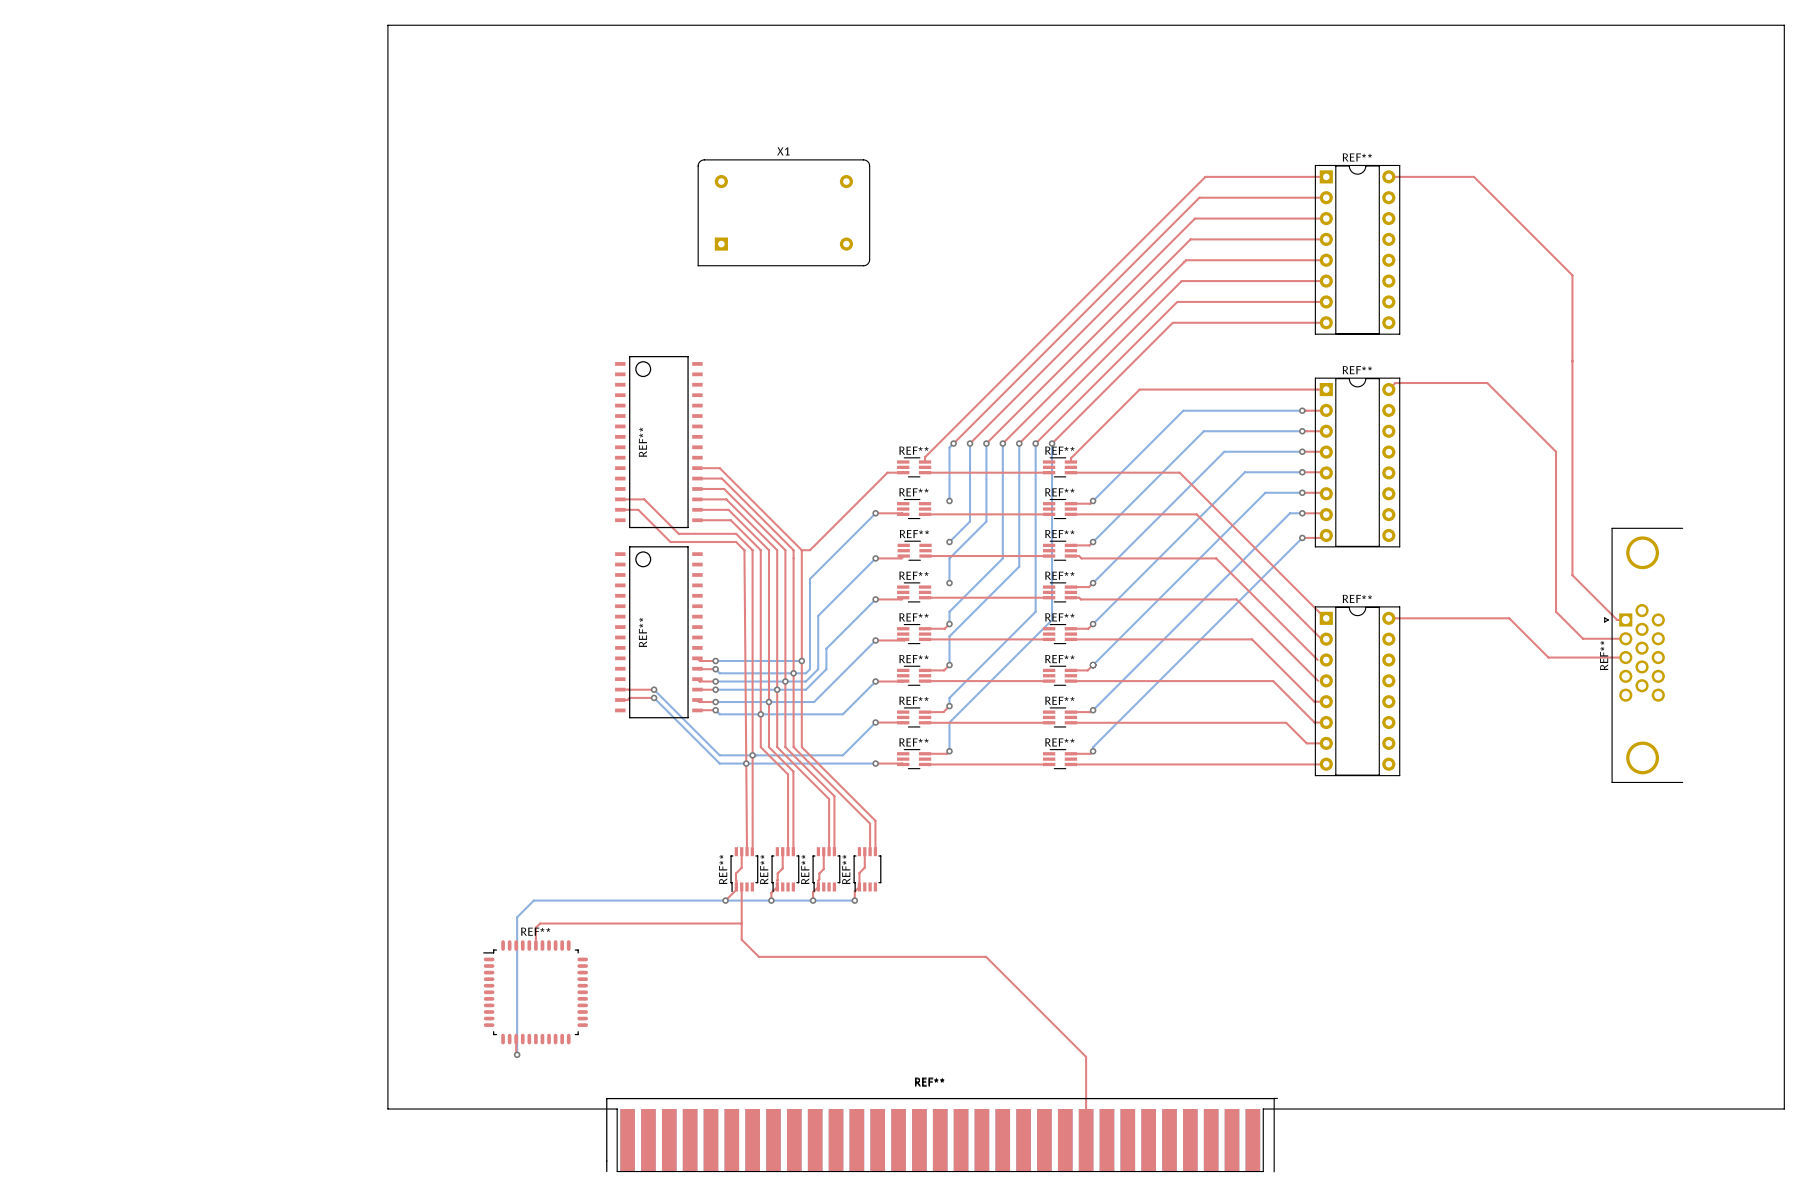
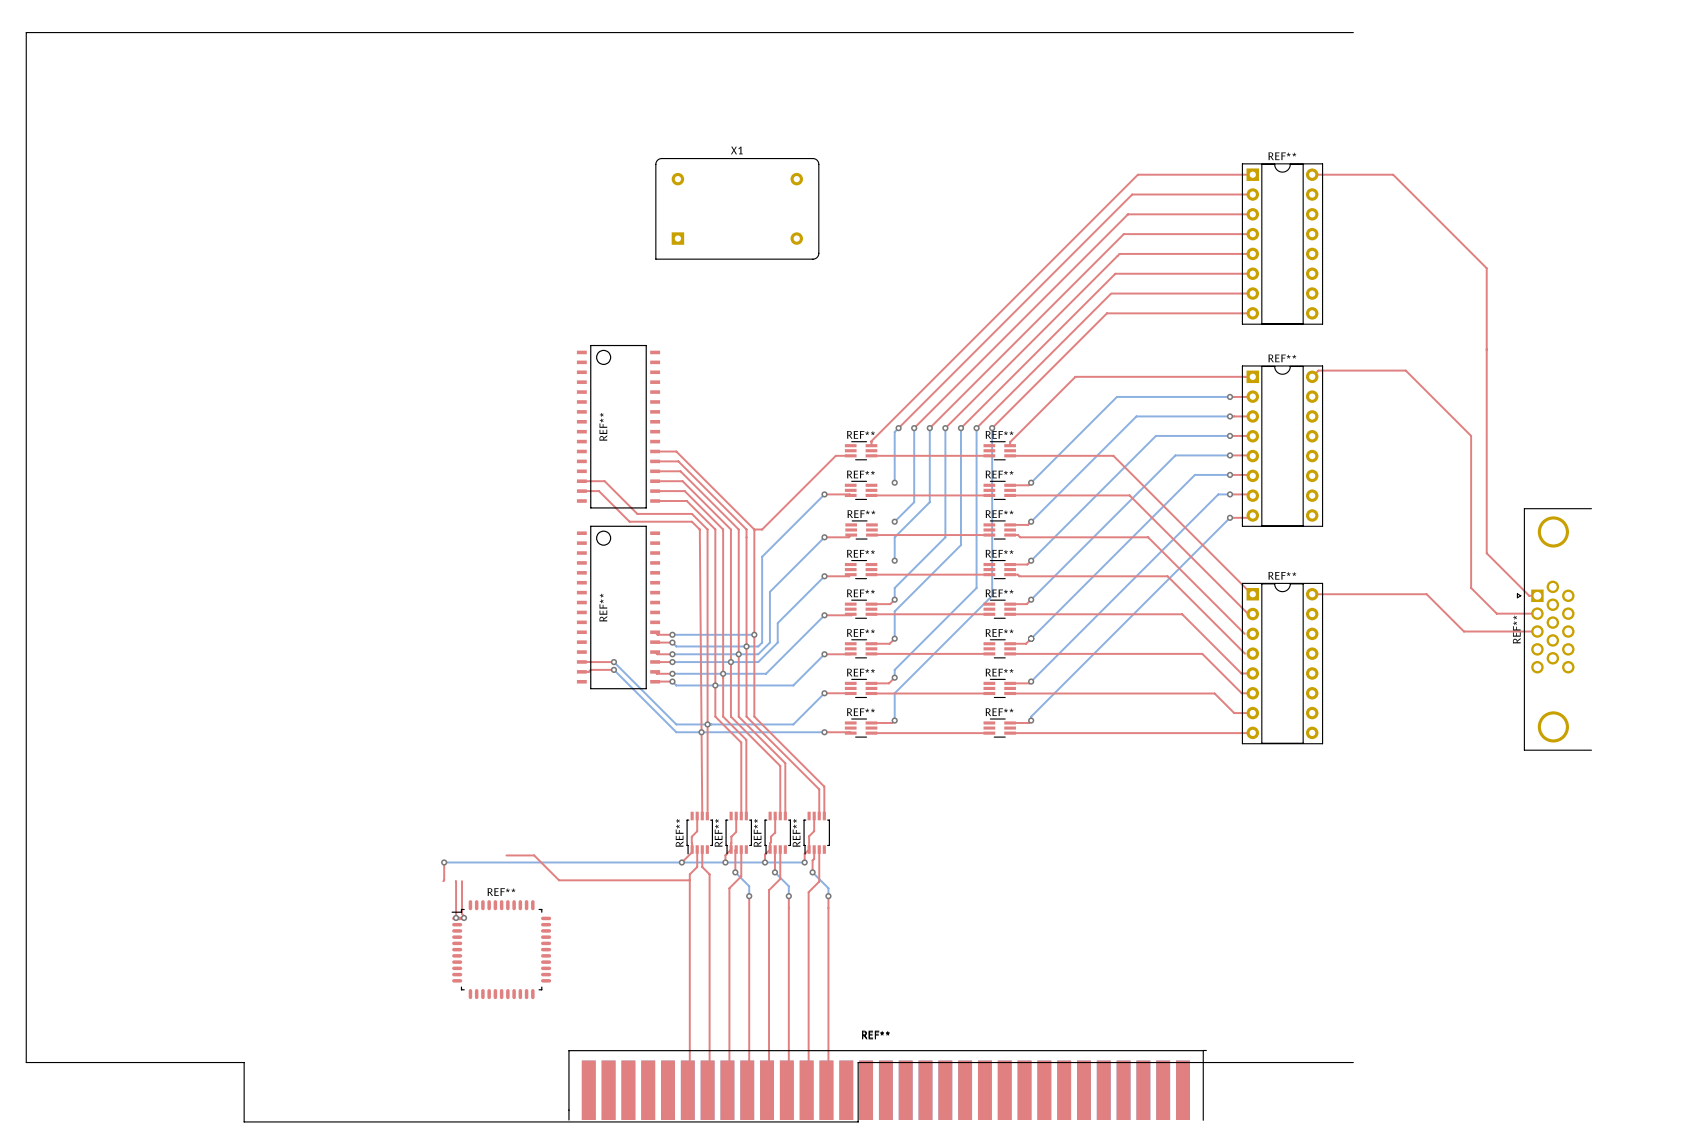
board edge: (387, 25) (1784, 25) (1784, 1109) (1263, 1109) (1263, 1171) (617, 1171) (617, 1109) (387, 1109) (387, 25) -> none
board edge: none -> (1353, 32) (26, 32) (26, 1062) (244, 1062) (244, 1121) (858, 1121) (858, 1062) (1353, 1062)
top track: none -> (702, 849) (702, 867) (709, 874) (709, 1092)
top track: none -> (736, 849) (735, 872)
top track: none -> (741, 849) (741, 876) (729, 888) (729, 1092)
top track: none -> (775, 849) (774, 872)
top track: none -> (780, 849) (780, 878) (769, 890) (769, 1092)
top track: none -> (814, 849) (812, 872)
top track: none -> (819, 849) (819, 881) (808, 892) (808, 1092)
top track: none -> (506, 855) (534, 855) (559, 880) (689, 880)
top track: none -> (444, 862) (443, 881)
via: none -> (444, 862)
bottom track: (533, 900) (517, 917) (517, 1054) -> (499, 862) (444, 862)
top track: (741, 905) (741, 939) (758, 956) (986, 956) (1086, 1056) (1086, 1140) -> (697, 866) (689, 874) (689, 1092)
bottom track: none -> (735, 872) (749, 886) (749, 896)
via: none -> (735, 872)
bottom track: none -> (774, 872) (788, 886) (788, 896)
via: none -> (774, 872)
bottom track: none -> (812, 872) (828, 888) (828, 896)
via: none -> (812, 872)
top track: none -> (455, 881) (456, 917)
top track: none -> (462, 881) (462, 913) (463, 917)
top track: (741, 923) (540, 923) (535, 927) (535, 945) -> none
top track: none -> (749, 896) (749, 1092)
via: none -> (749, 896)
top track: none -> (788, 896) (788, 1092)
via: none -> (788, 896)
top track: none -> (828, 896) (828, 1092)
via: none -> (828, 896)
via: none -> (456, 917)
via: none -> (463, 917)
top track: (516, 1039) (517, 1054) -> none
via: (517, 1054) -> none

